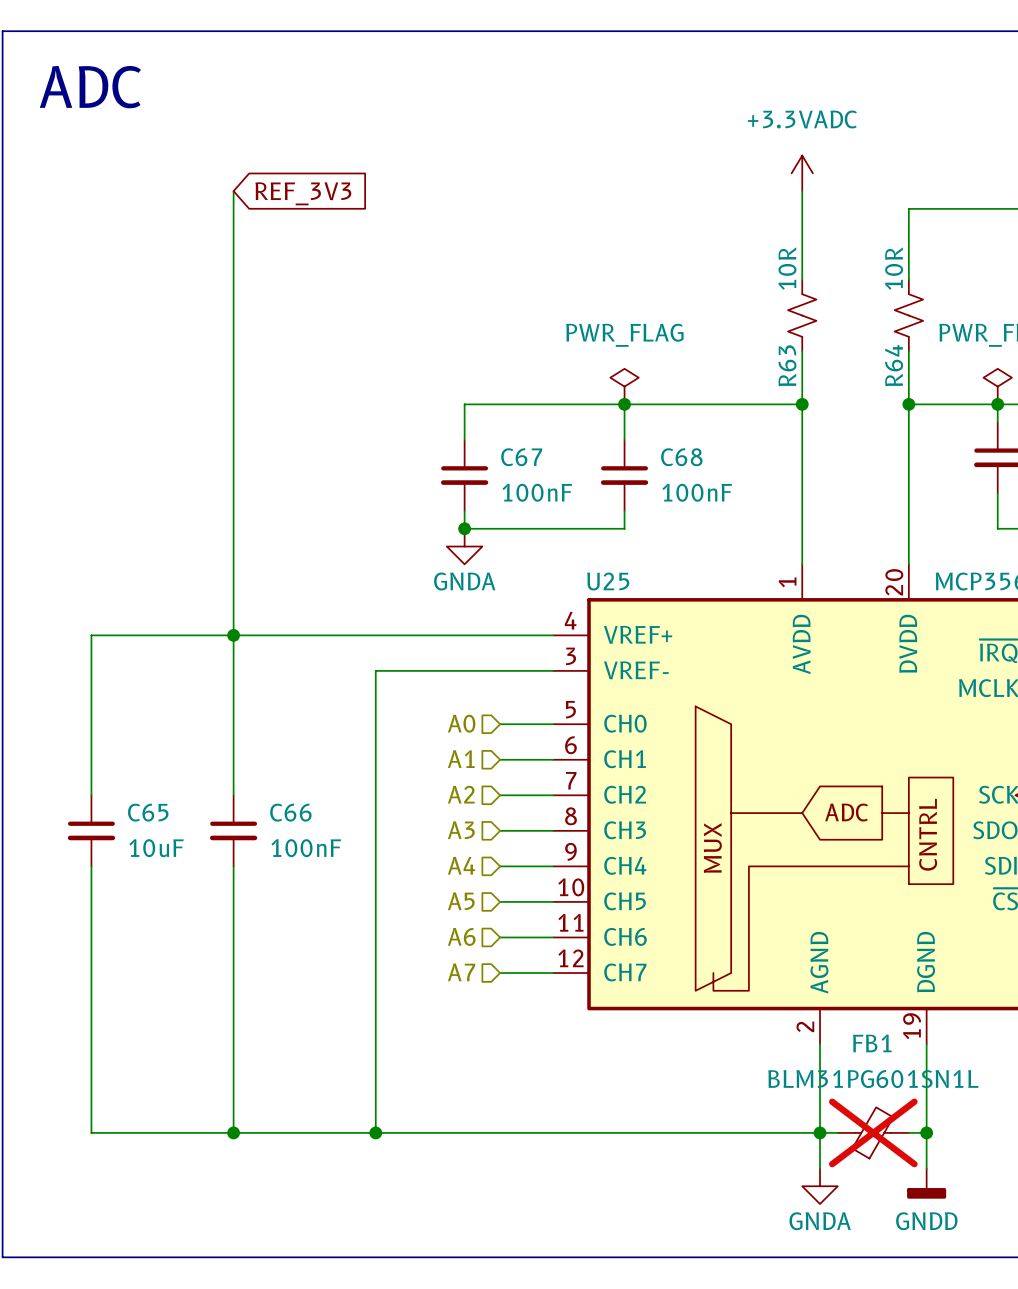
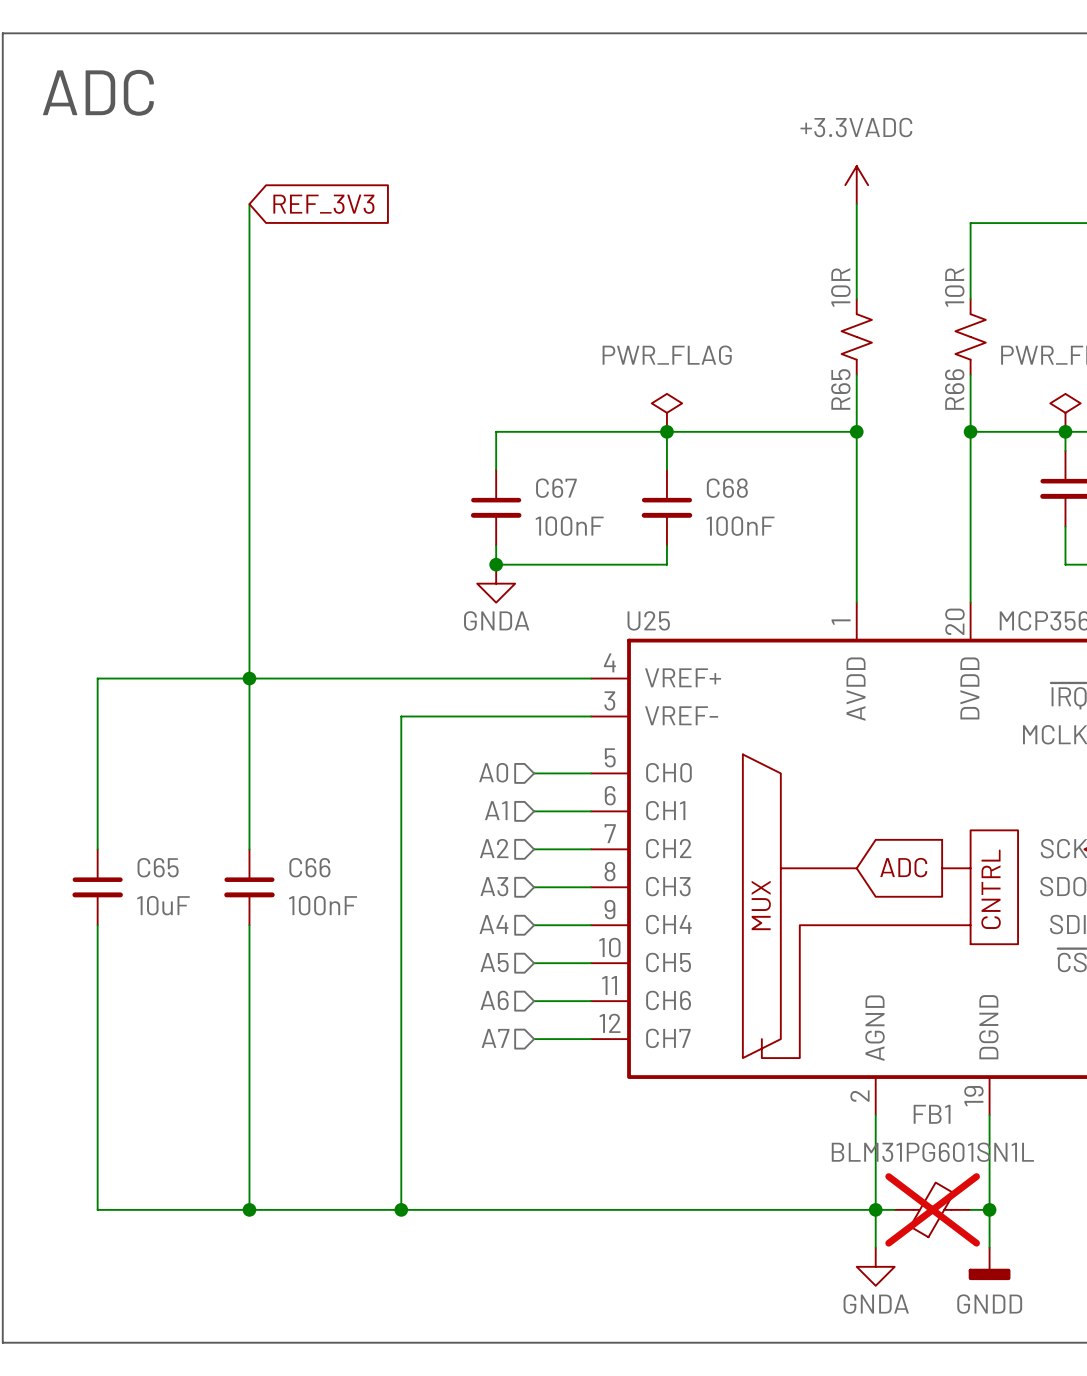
R63 name: R63 (787, 365) -> R65 (840, 389)
R64 name: R64 (894, 365) -> R66 (954, 389)

